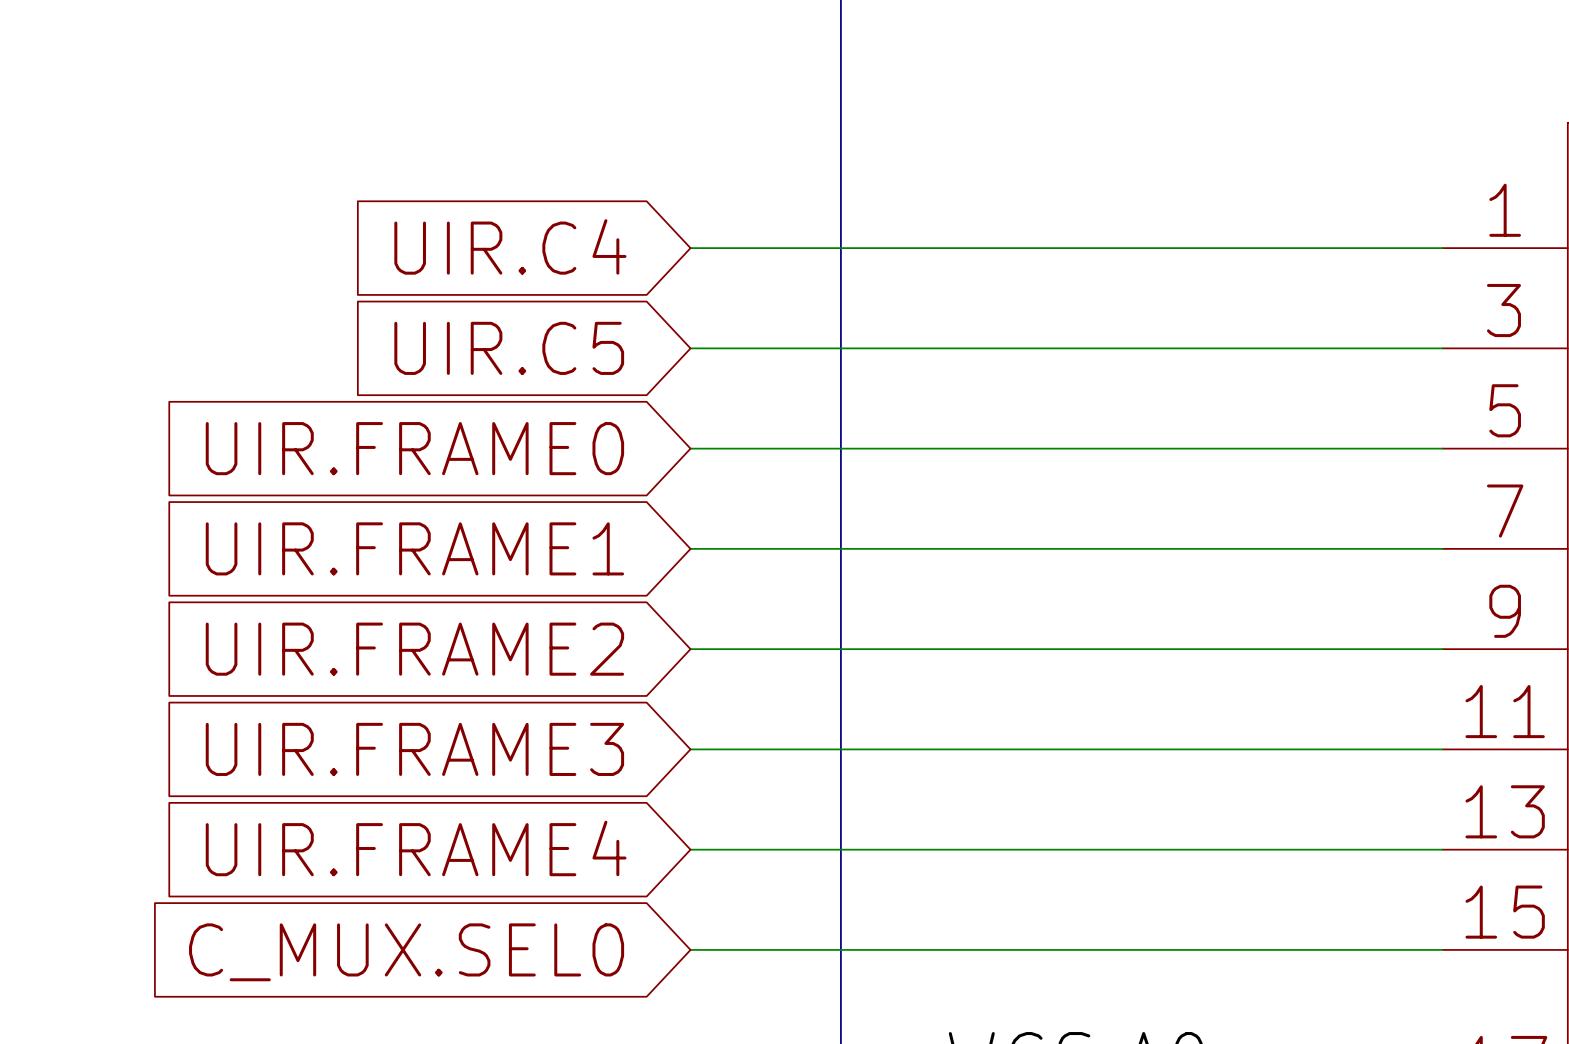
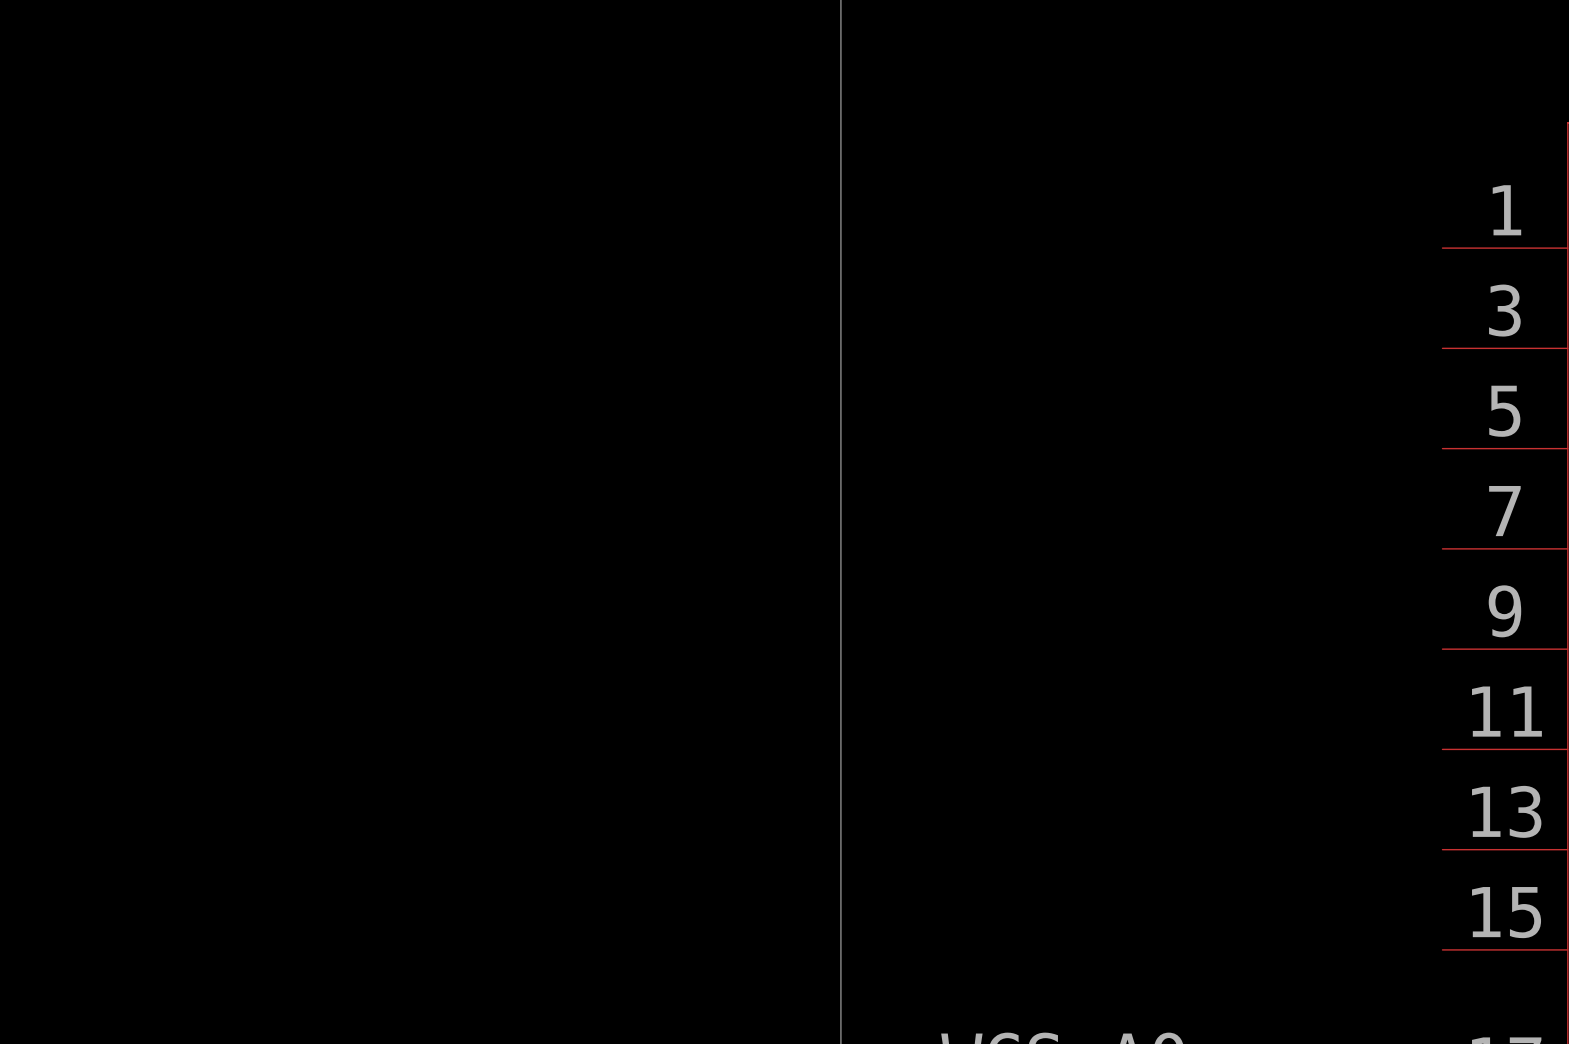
global label: UIR.C4 (510, 246) -> none
wire: (690, 248) (1442, 248) -> none
global label: UIR.C5 (509, 348) -> none
wire: (690, 348) (1442, 348) -> none
global label: UIR.FRAME0 (414, 448) -> none
wire: (690, 448) (1442, 448) -> none
global label: UIR.FRAME1 (414, 548) -> none
wire: (690, 548) (1442, 548) -> none
global label: UIR.FRAME2 (414, 649) -> none
wire: (690, 649) (1442, 649) -> none
global label: UIR.FRAME3 (414, 749) -> none
wire: (690, 749) (1442, 749) -> none
global label: UIR.FRAME4 (416, 848) -> none
wire: (690, 849) (1442, 849) -> none
wire: (690, 949) (1442, 949) -> none
global label: C_MUX.SEL0 (406, 952) -> none

